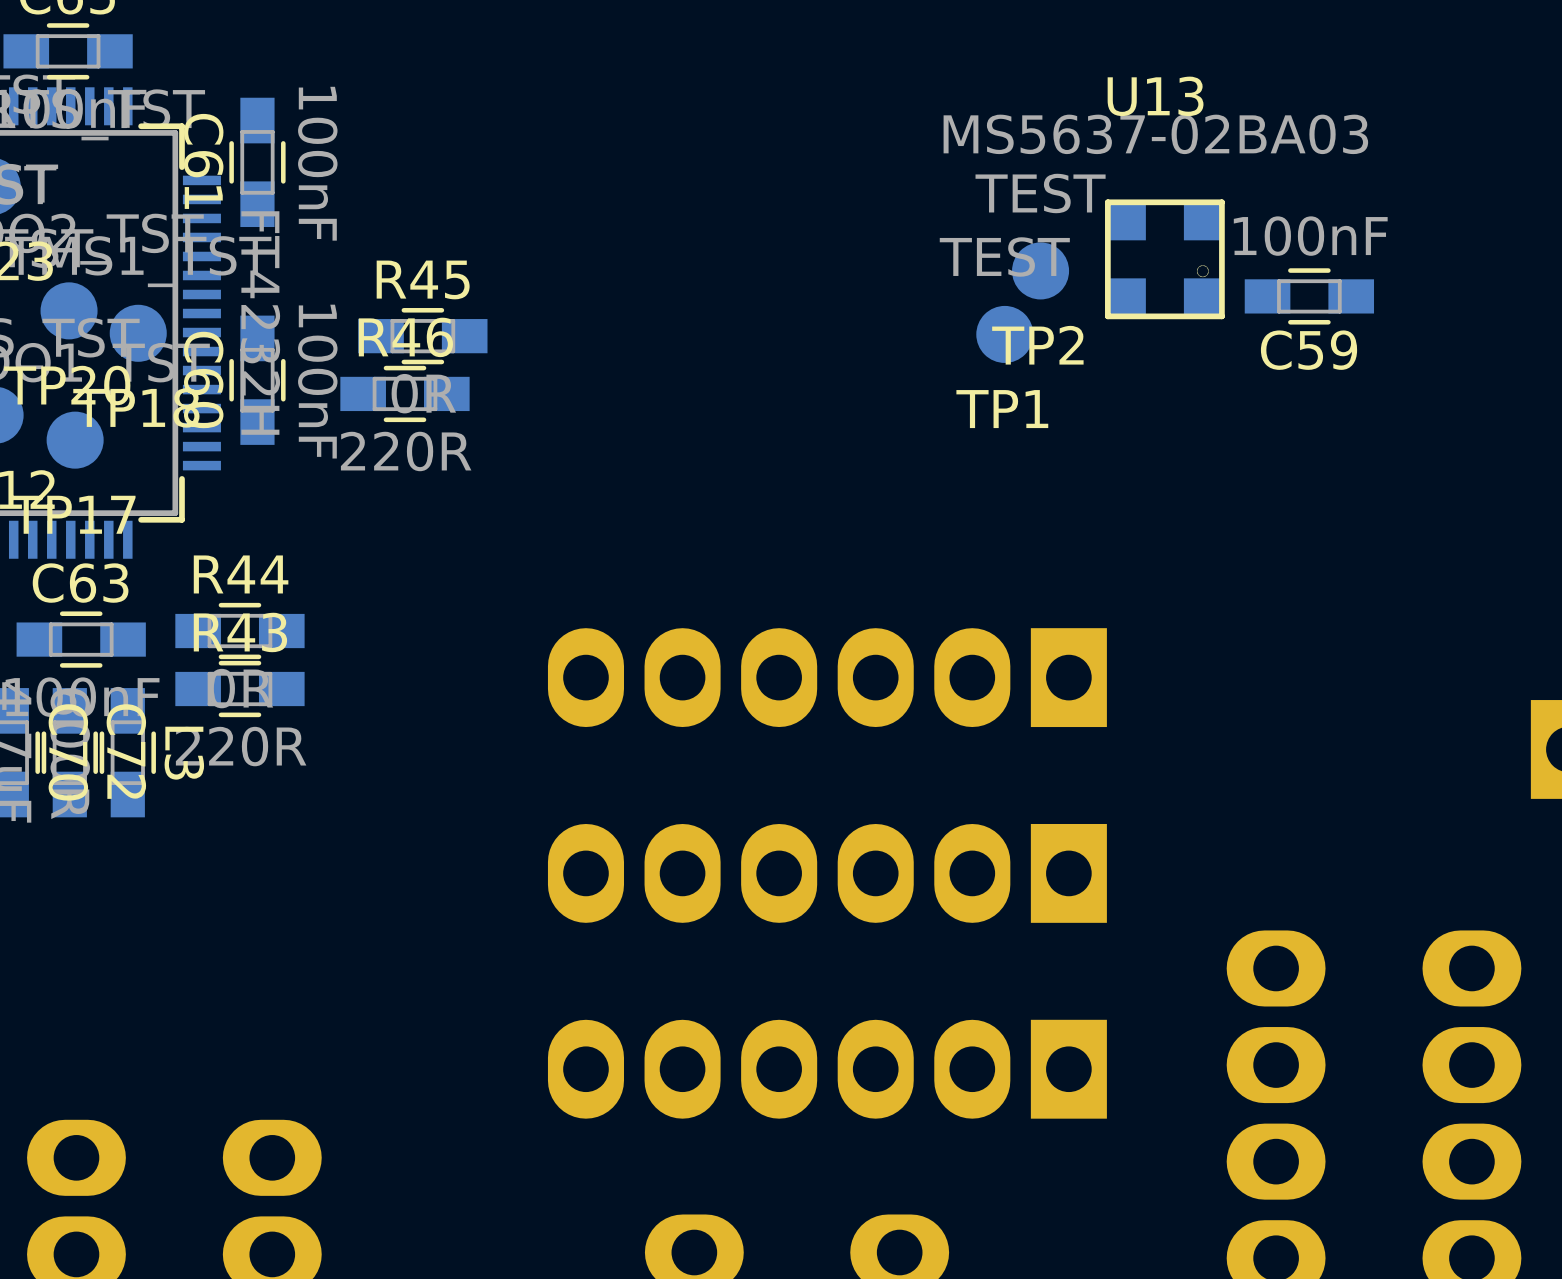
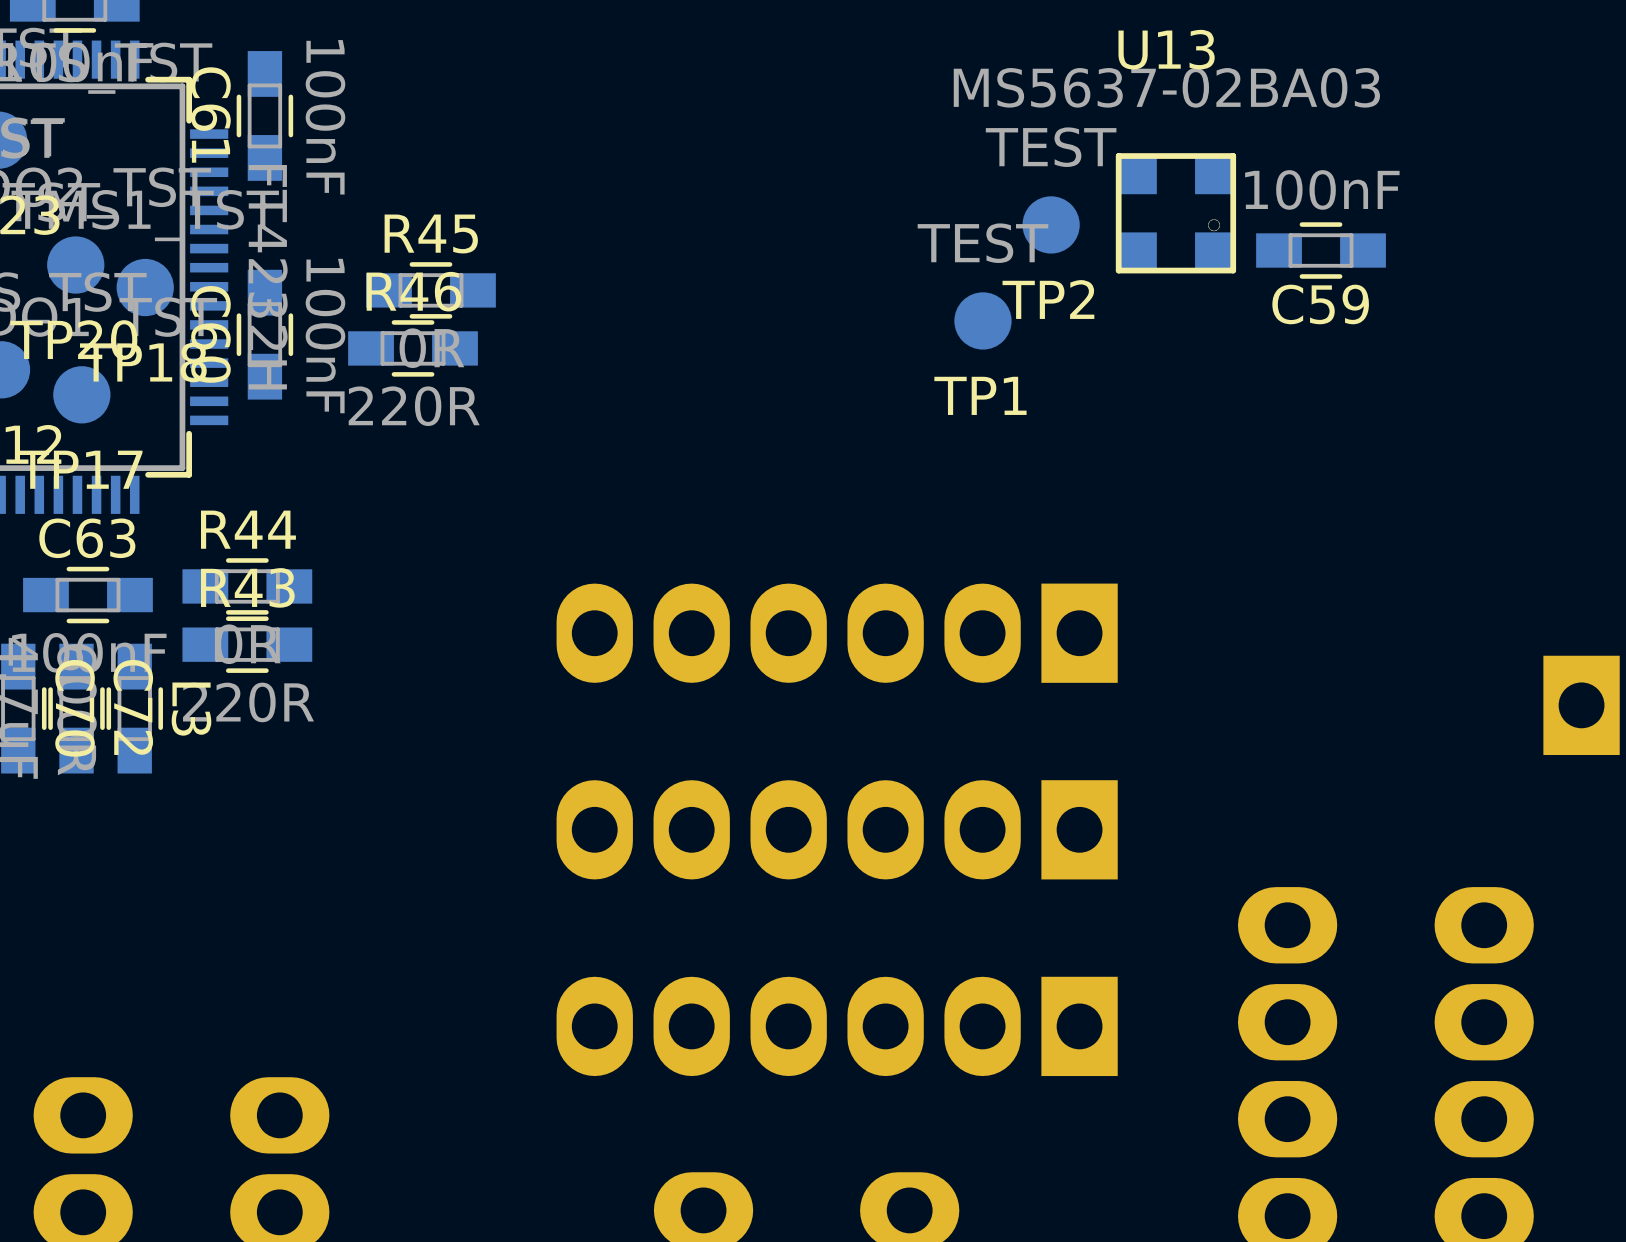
TP1 position: (1004, 334) -> (982, 320)

